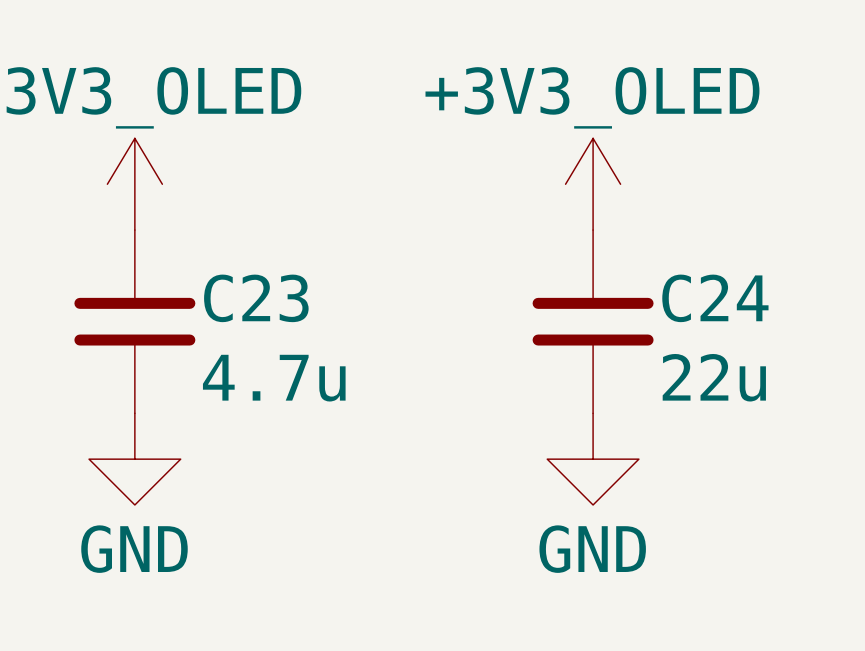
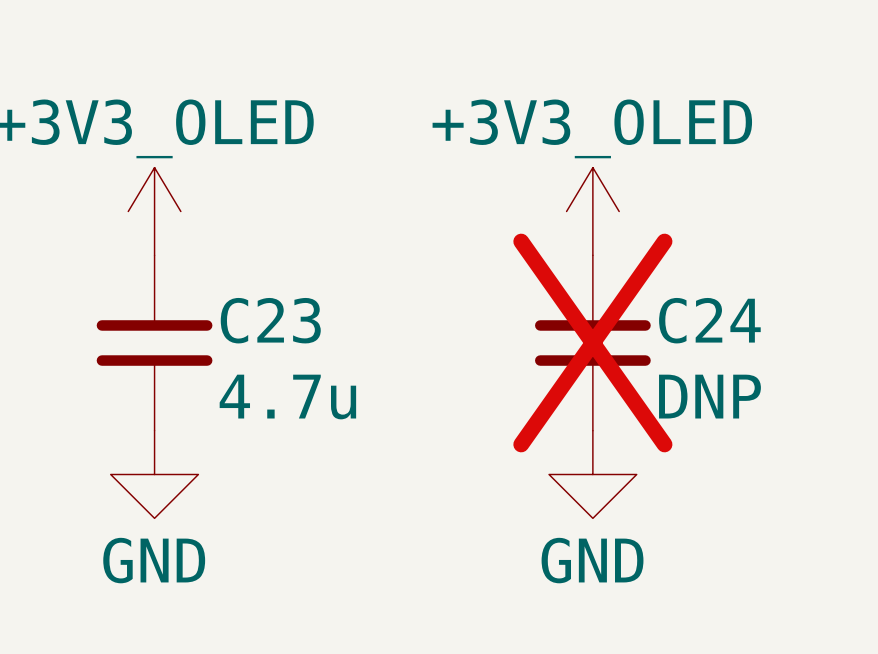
C24 do-not-place cross: none -> (592, 343)
C24 value: 22u (714, 377) -> DNP (709, 396)

